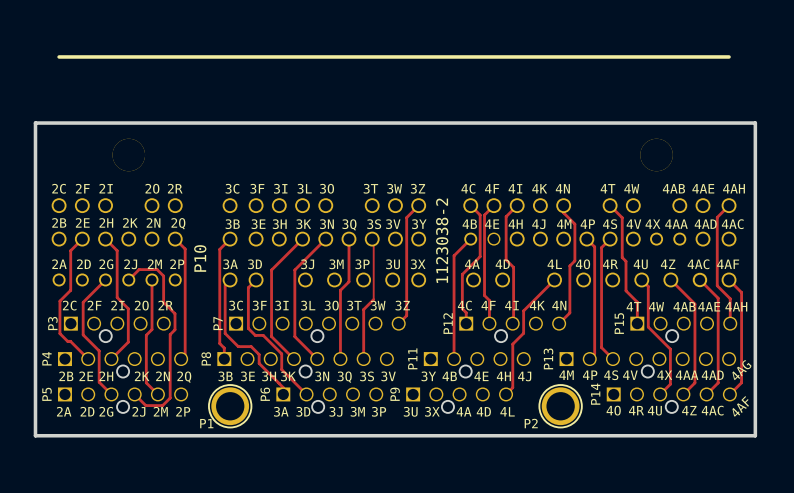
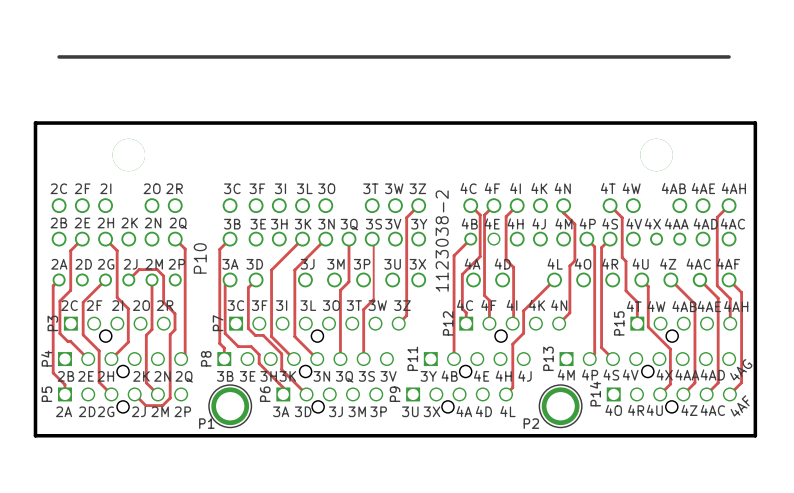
track: none -> (59, 279) (53, 285) (53, 372) (64, 384) (64, 394)

